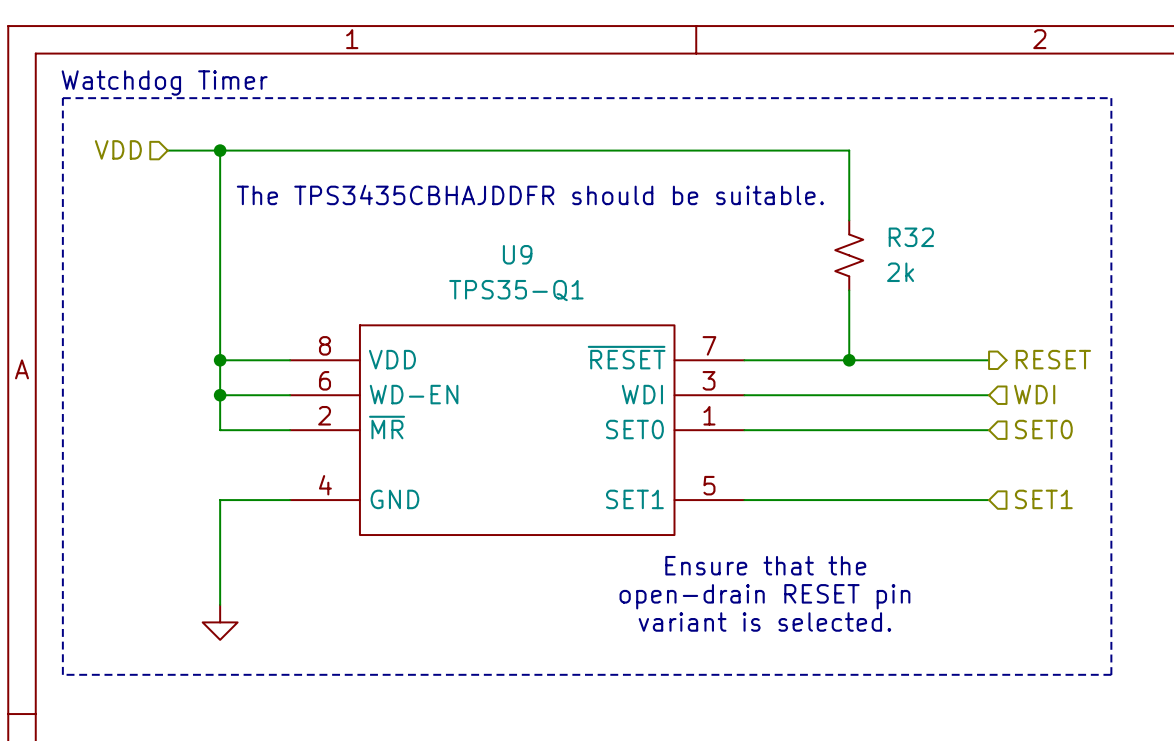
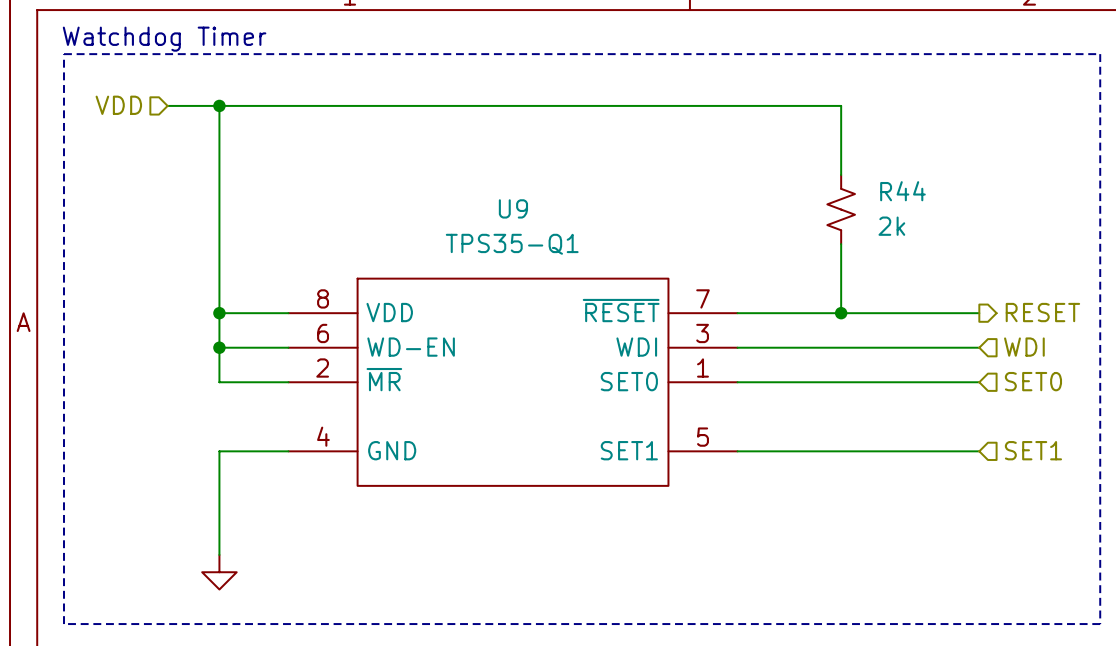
text: The TPS3435CBHAJDDFR should be suitable. (530, 195) -> none
R32 name: R32 (911, 237) -> R44 (902, 191)
text: Ensure that the (765, 565) -> none
text: open-drain RESET pin (764, 596) -> none
text: variant is selected. (764, 621) -> none

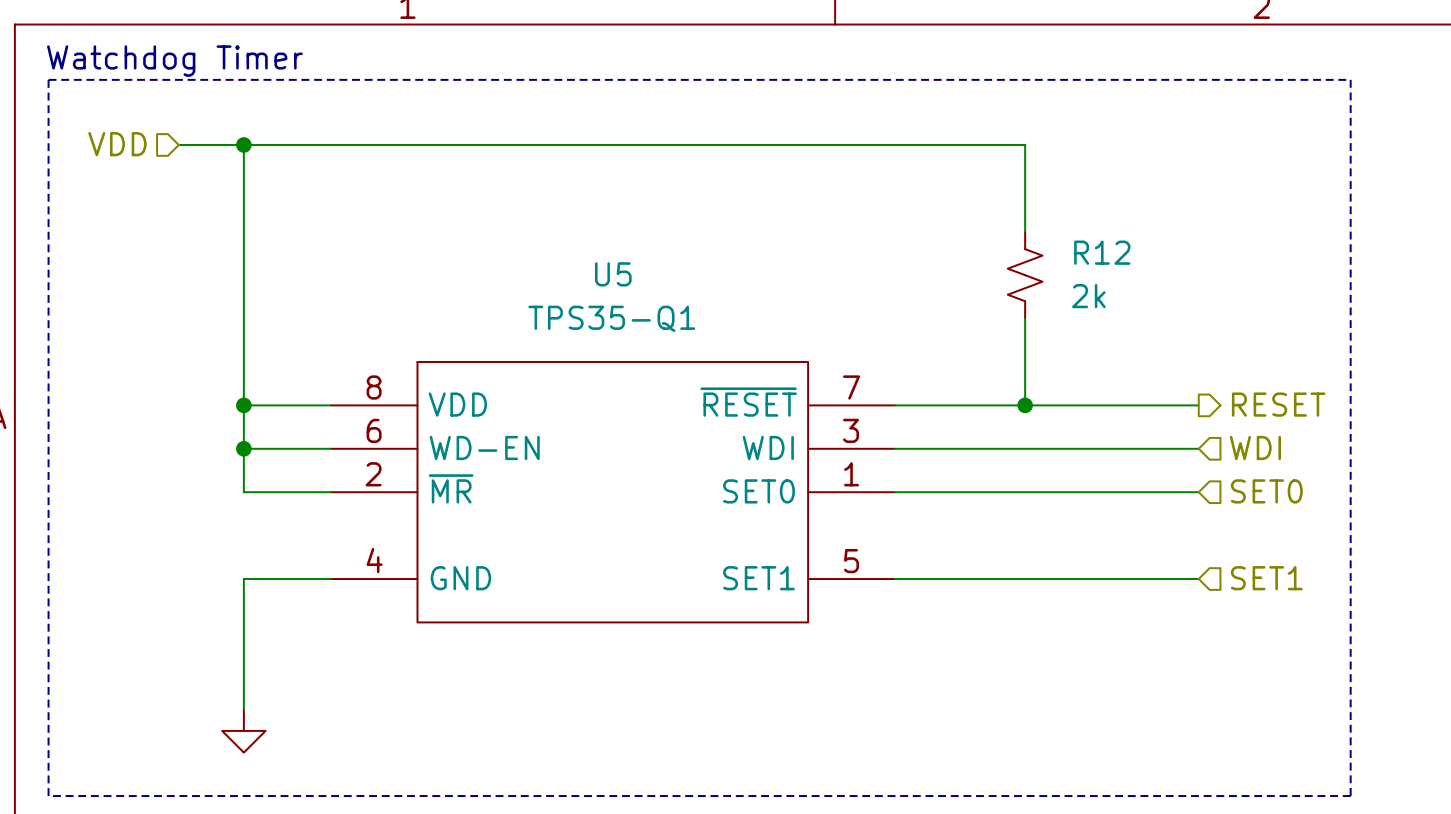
R44 name: R44 (902, 191) -> R12 (1102, 252)
U9 name: U9 (513, 208) -> U5 (613, 274)

